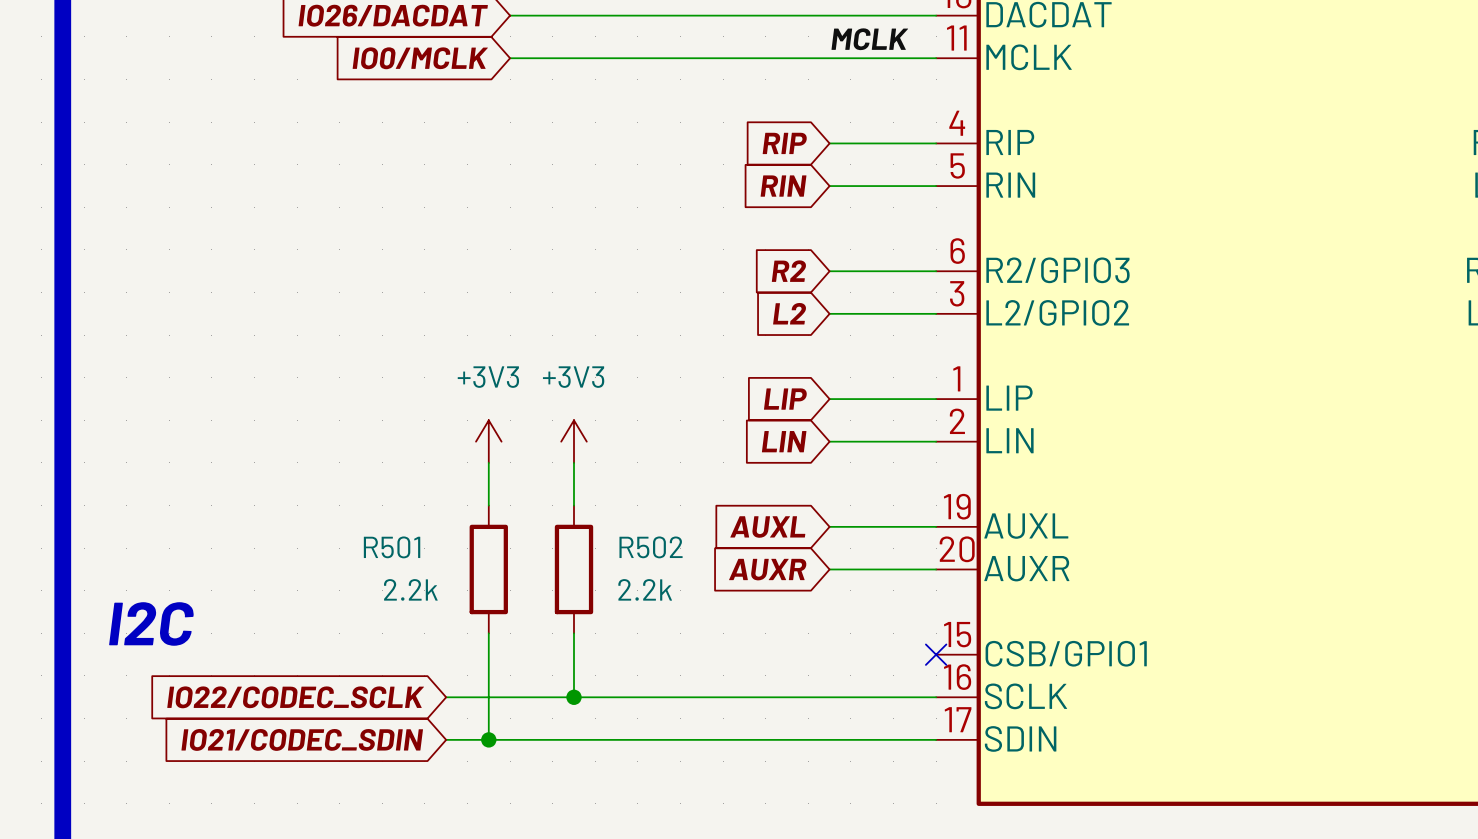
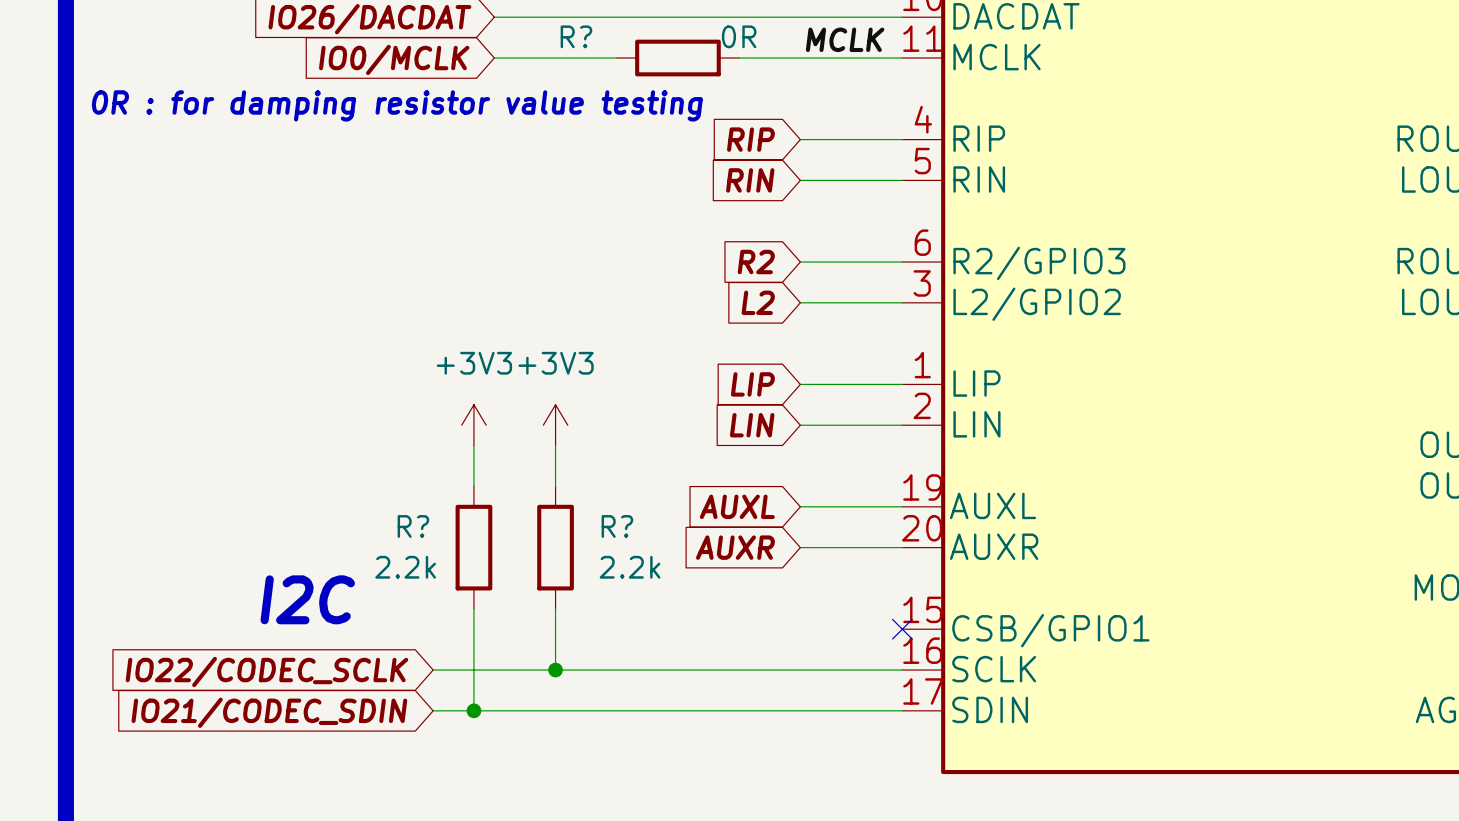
wire: (637, 58) (765, 58) -> none
R?: none -> 0R (677, 58)
text: none -> 0R : for damping resistor value testing (397, 105)
R501 name: R501 (392, 547) -> R? (413, 526)
R502 name: R502 (651, 547) -> R? (617, 526)
text position: I2C (151, 623) -> I2C (307, 599)

